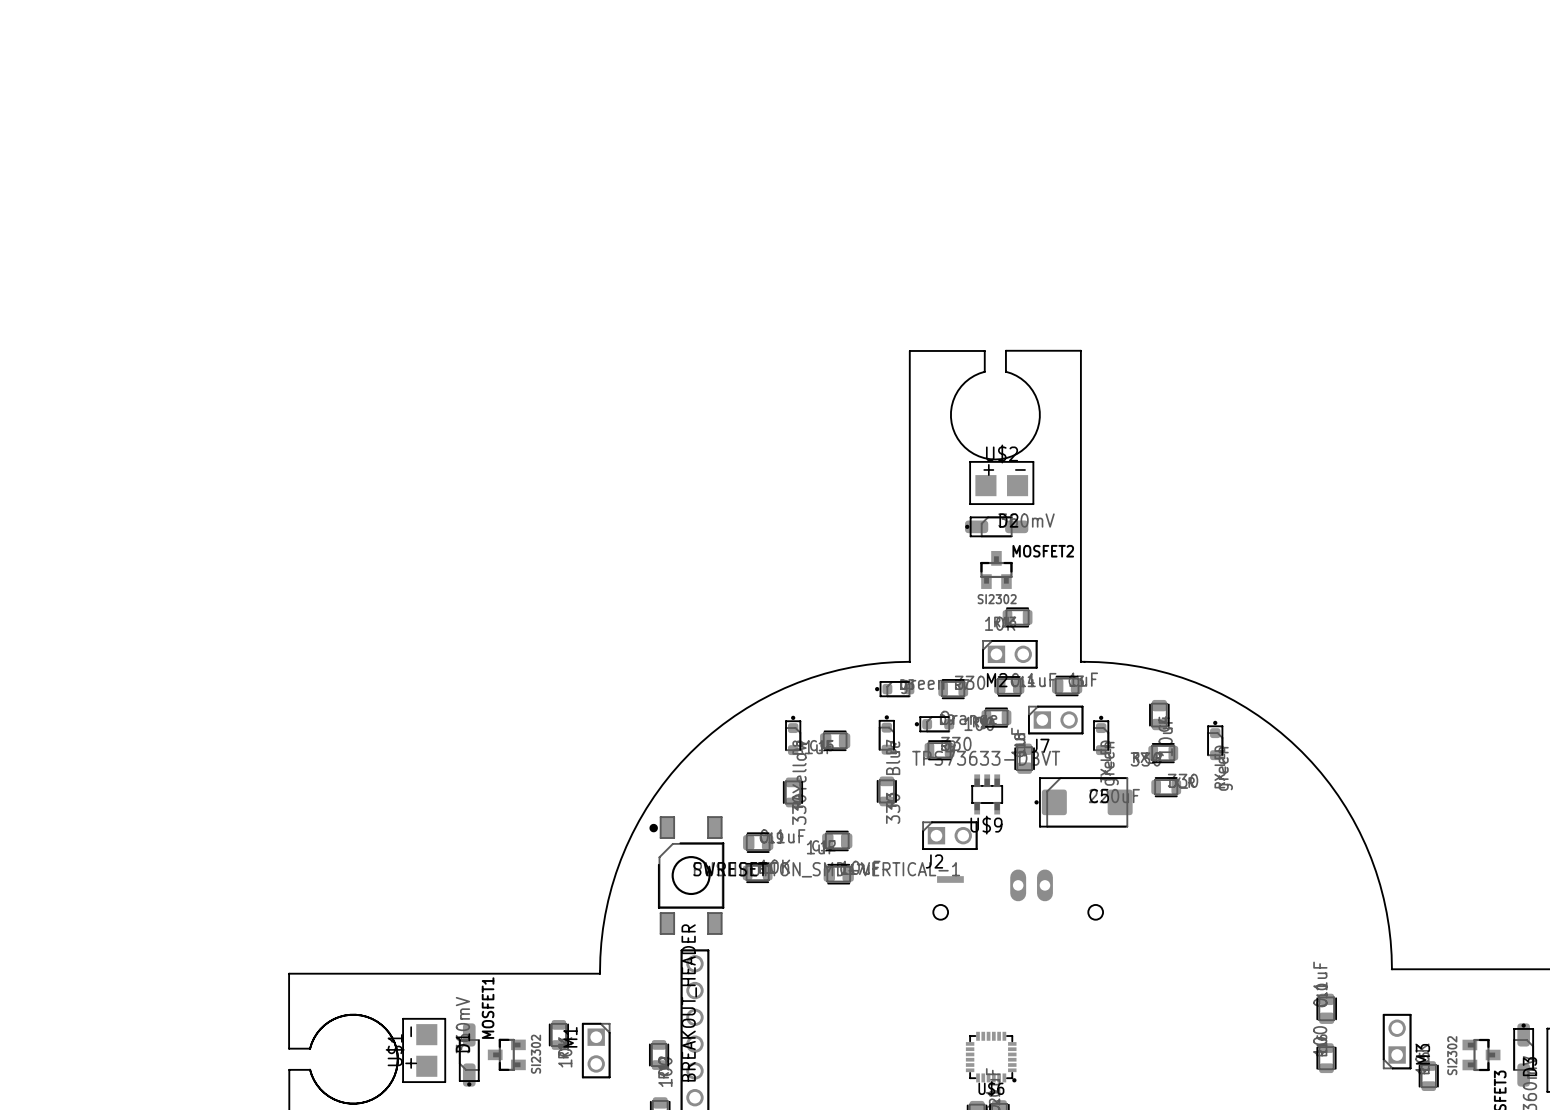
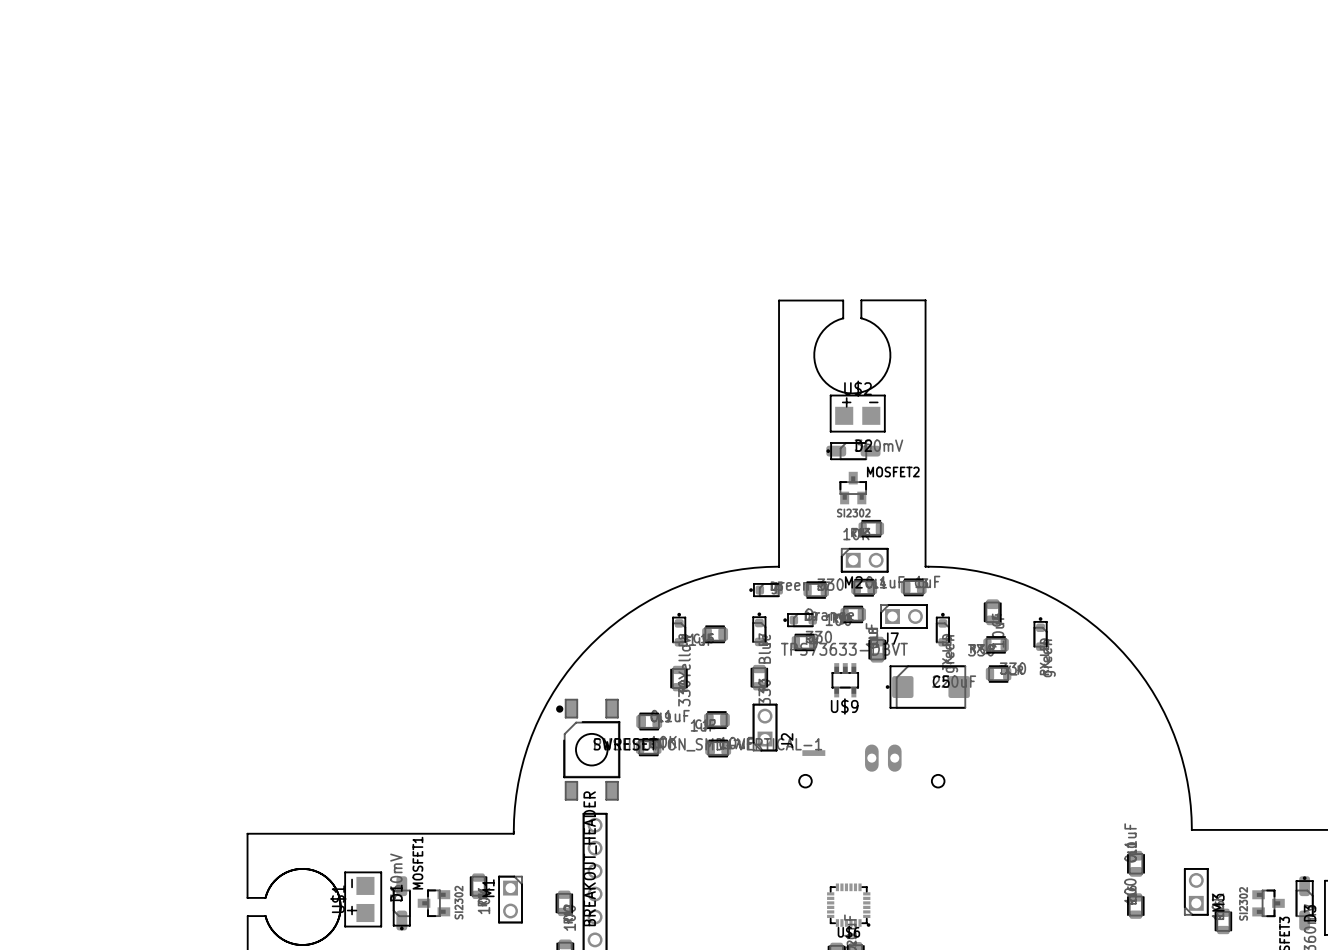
J2 rotation: 0° (949, 835) -> 90° counterclockwise (765, 727)
J2 position: (949, 835) -> (765, 727)

